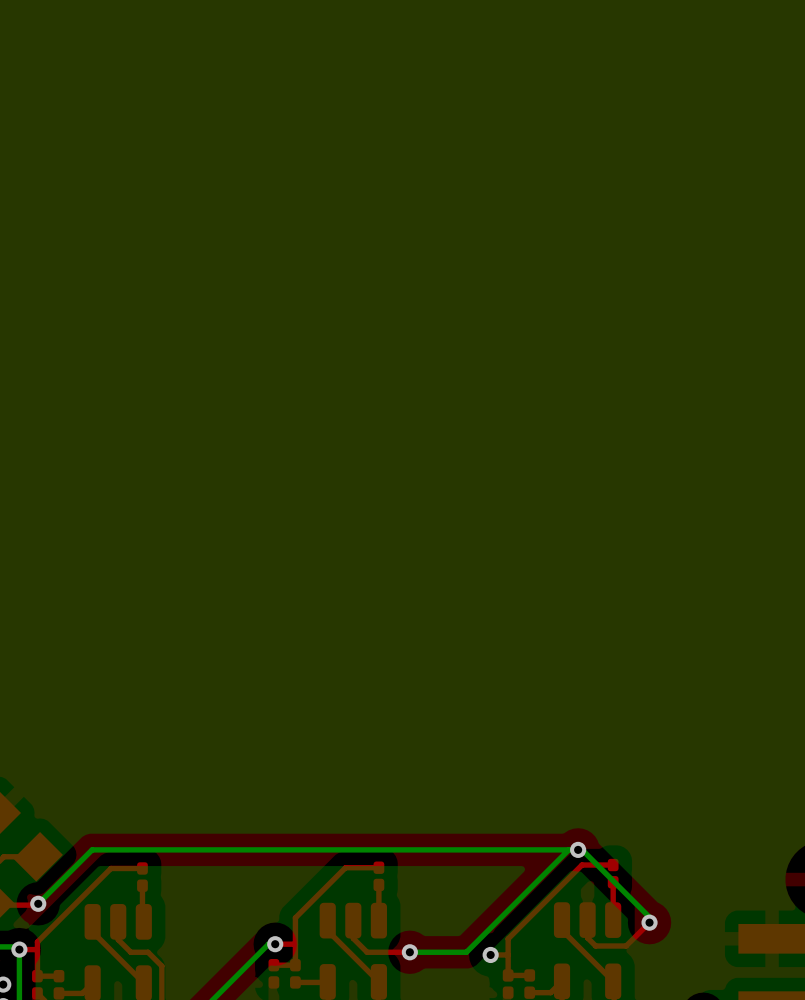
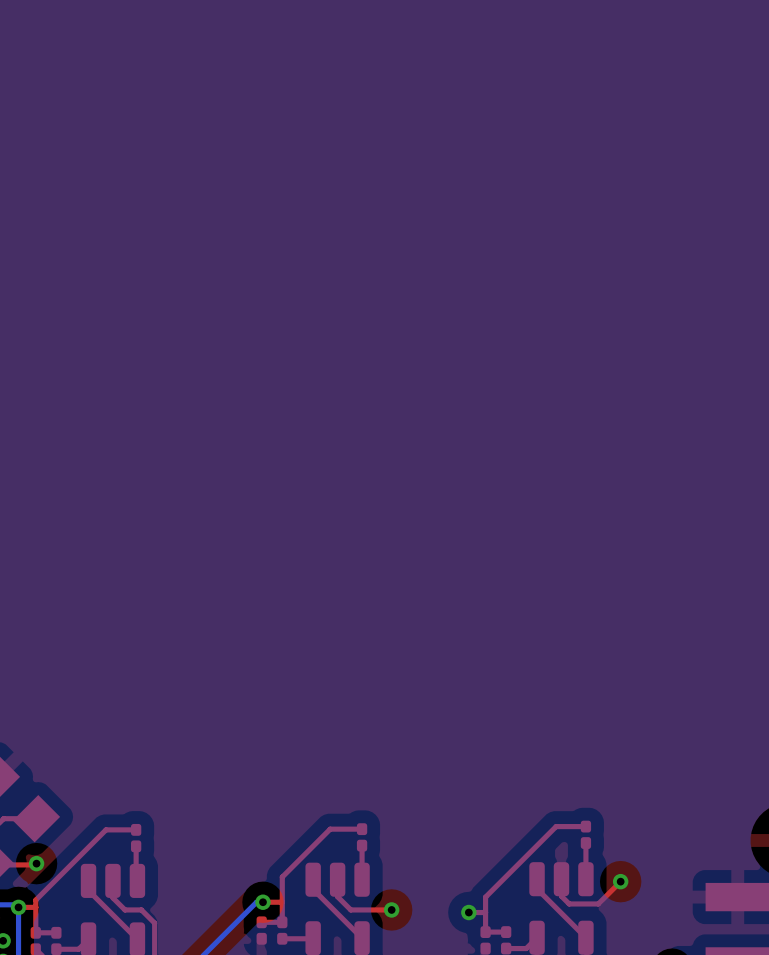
bottom track: (568, 849) (466, 952) (409, 952) -> none
via: (578, 849) -> none
bottom track: (38, 903) (92, 849) (582, 849) (649, 917) (649, 922) -> none

